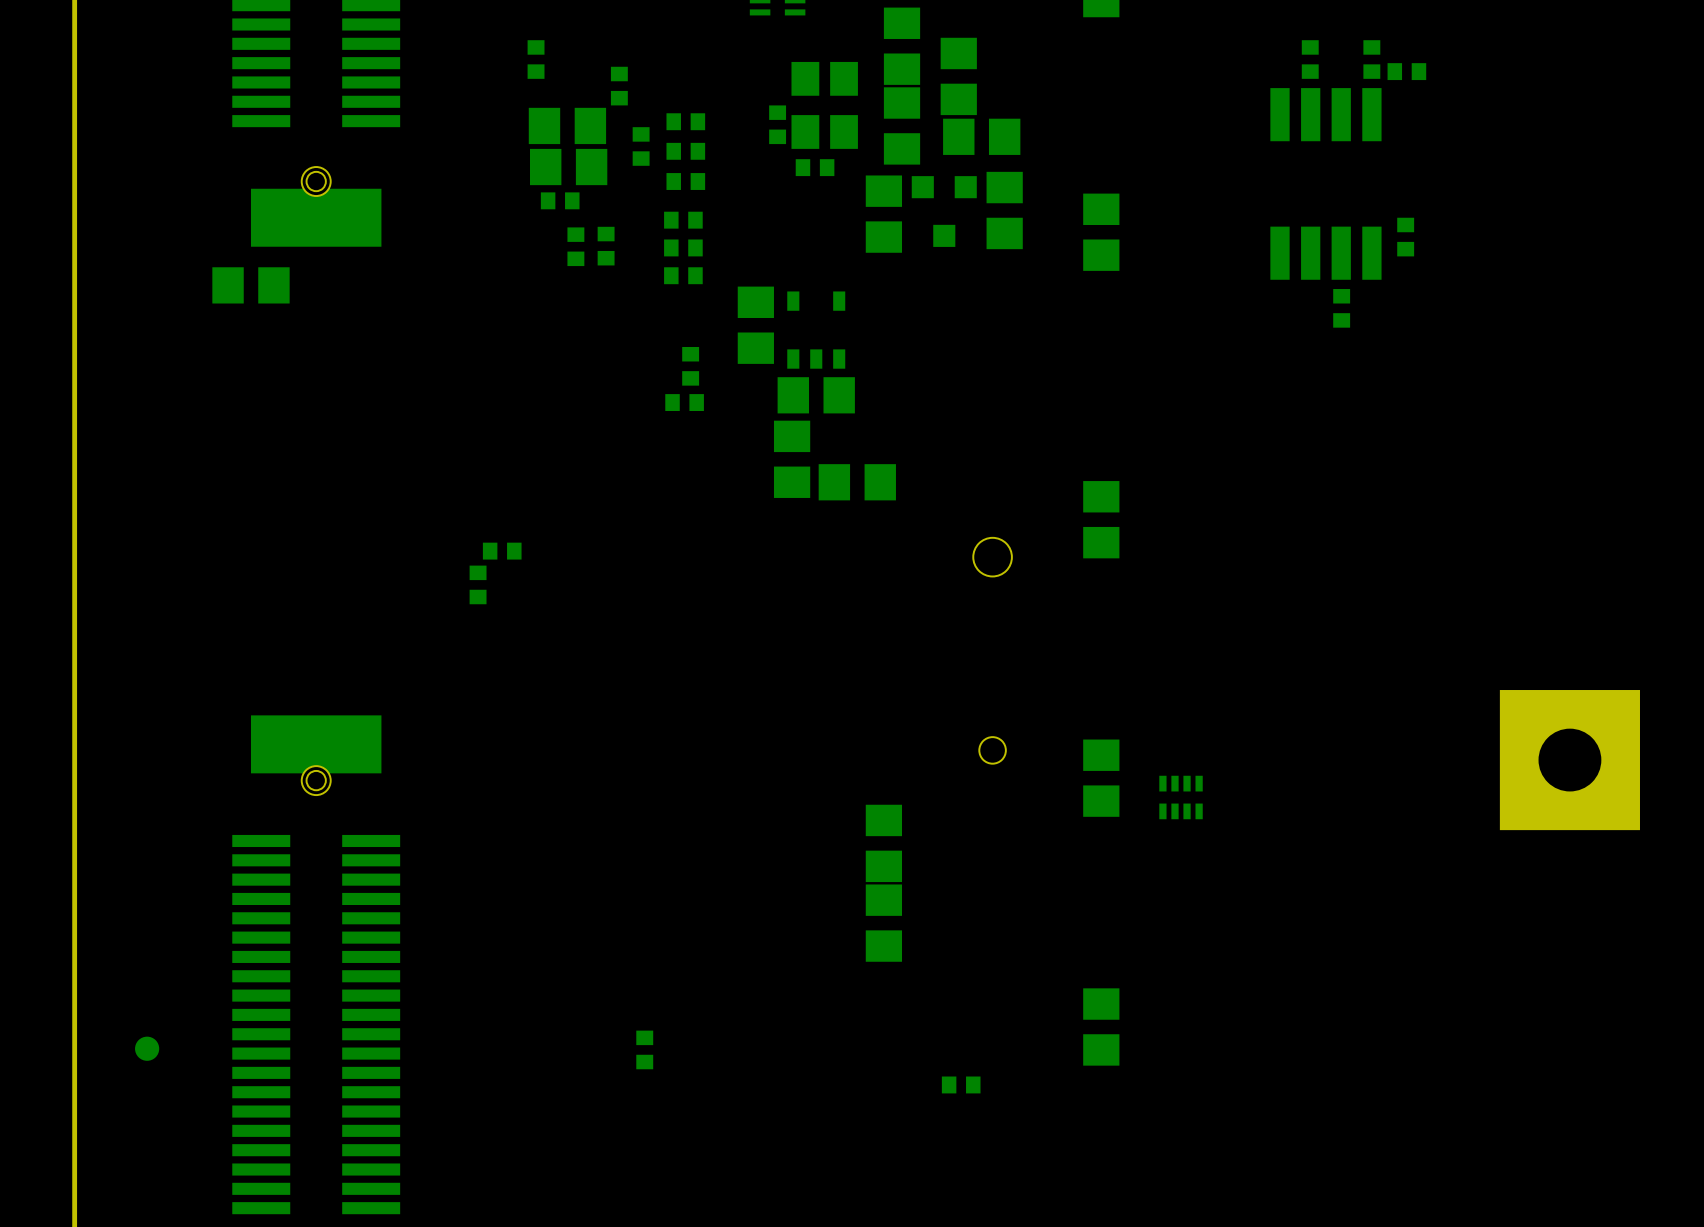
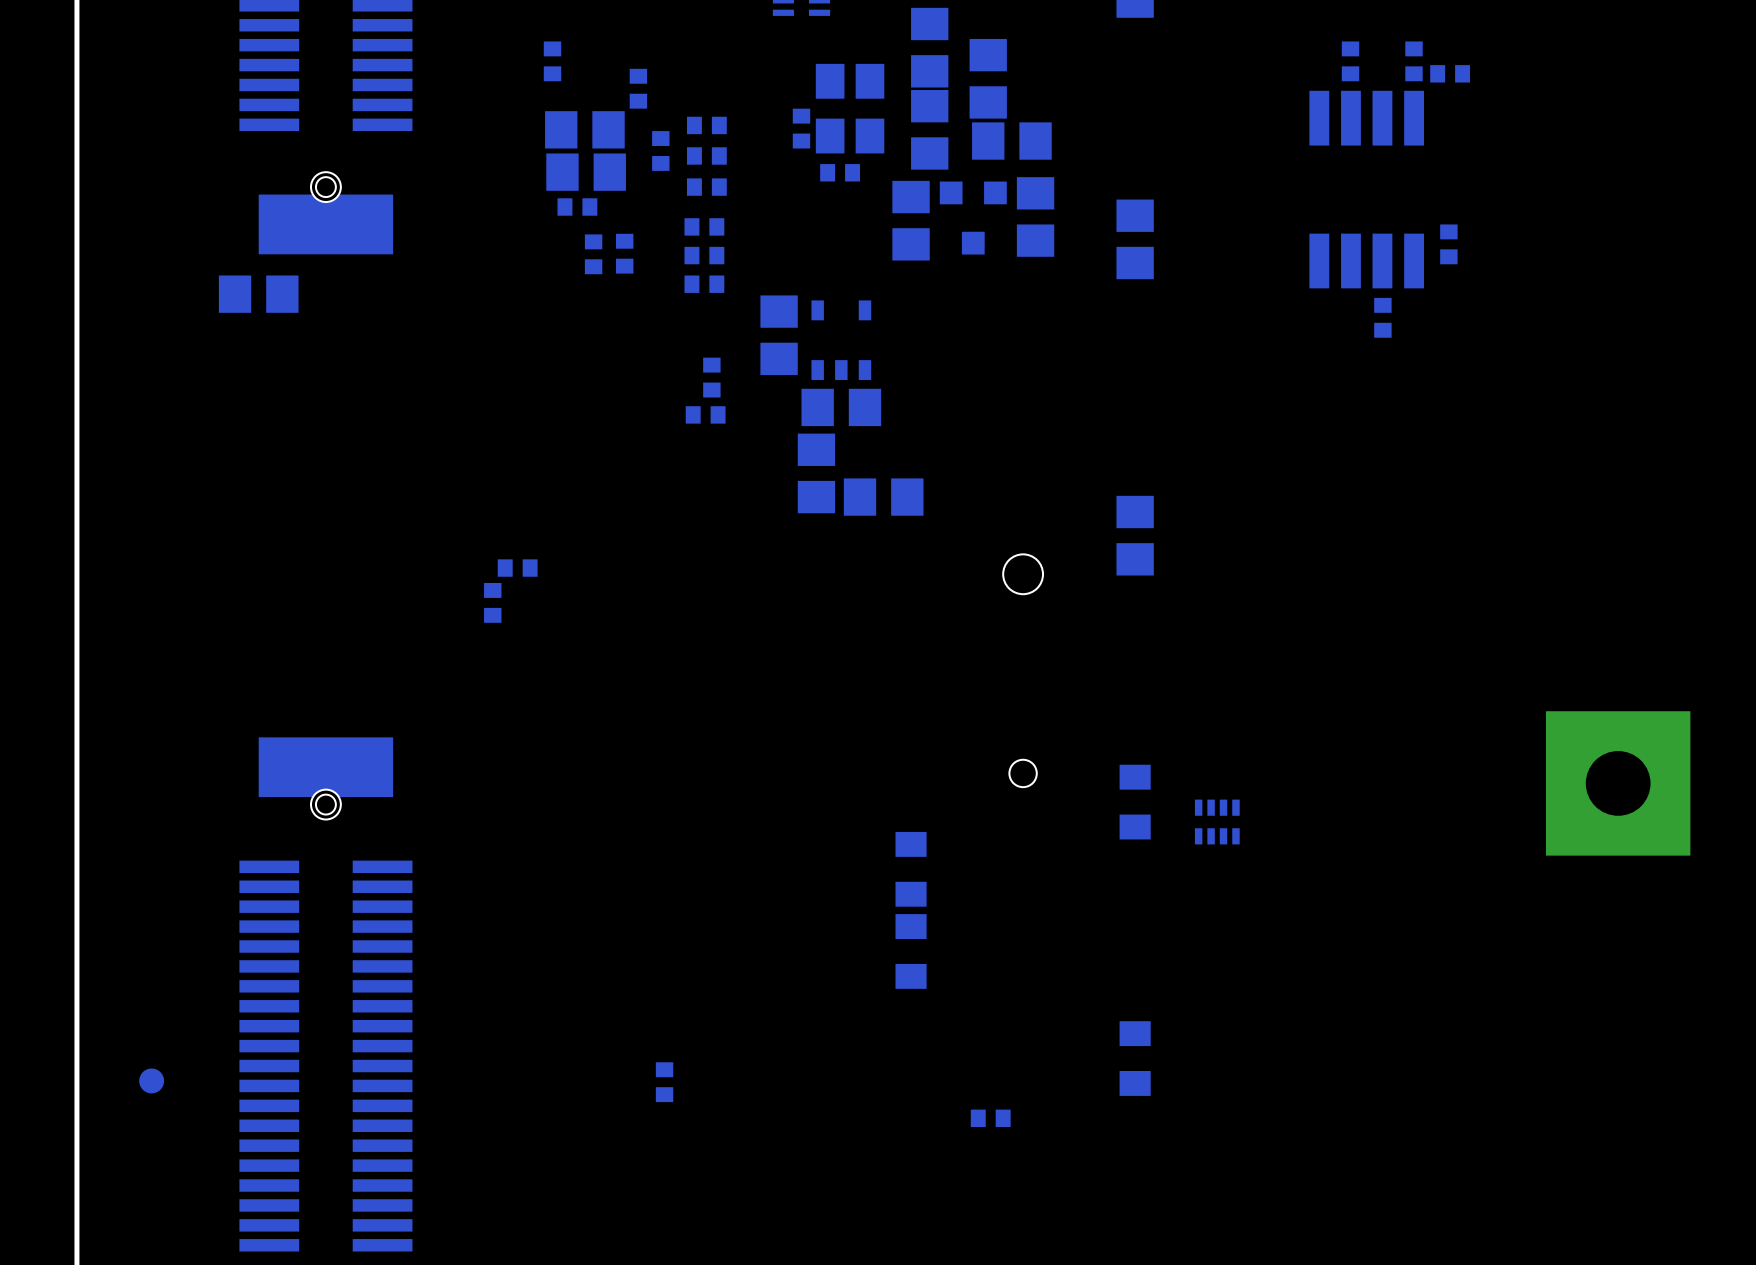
part footprint: [1083, 739, 1120, 817] -> [1119, 764, 1151, 840]
part footprint: [865, 804, 903, 883] -> [895, 831, 927, 907]
part footprint: [865, 884, 903, 962] -> [895, 914, 927, 989]
part footprint: [1083, 988, 1120, 1066] -> [1119, 1021, 1151, 1096]

